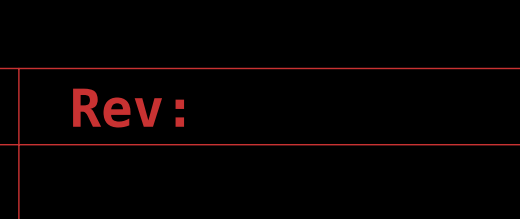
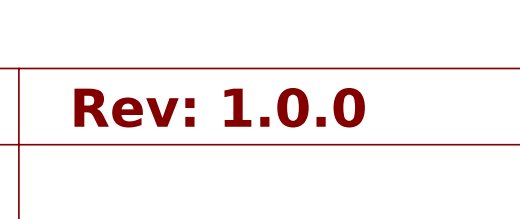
title block: Rev: (128, 108) -> Rev: 1.0.0 (219, 107)

